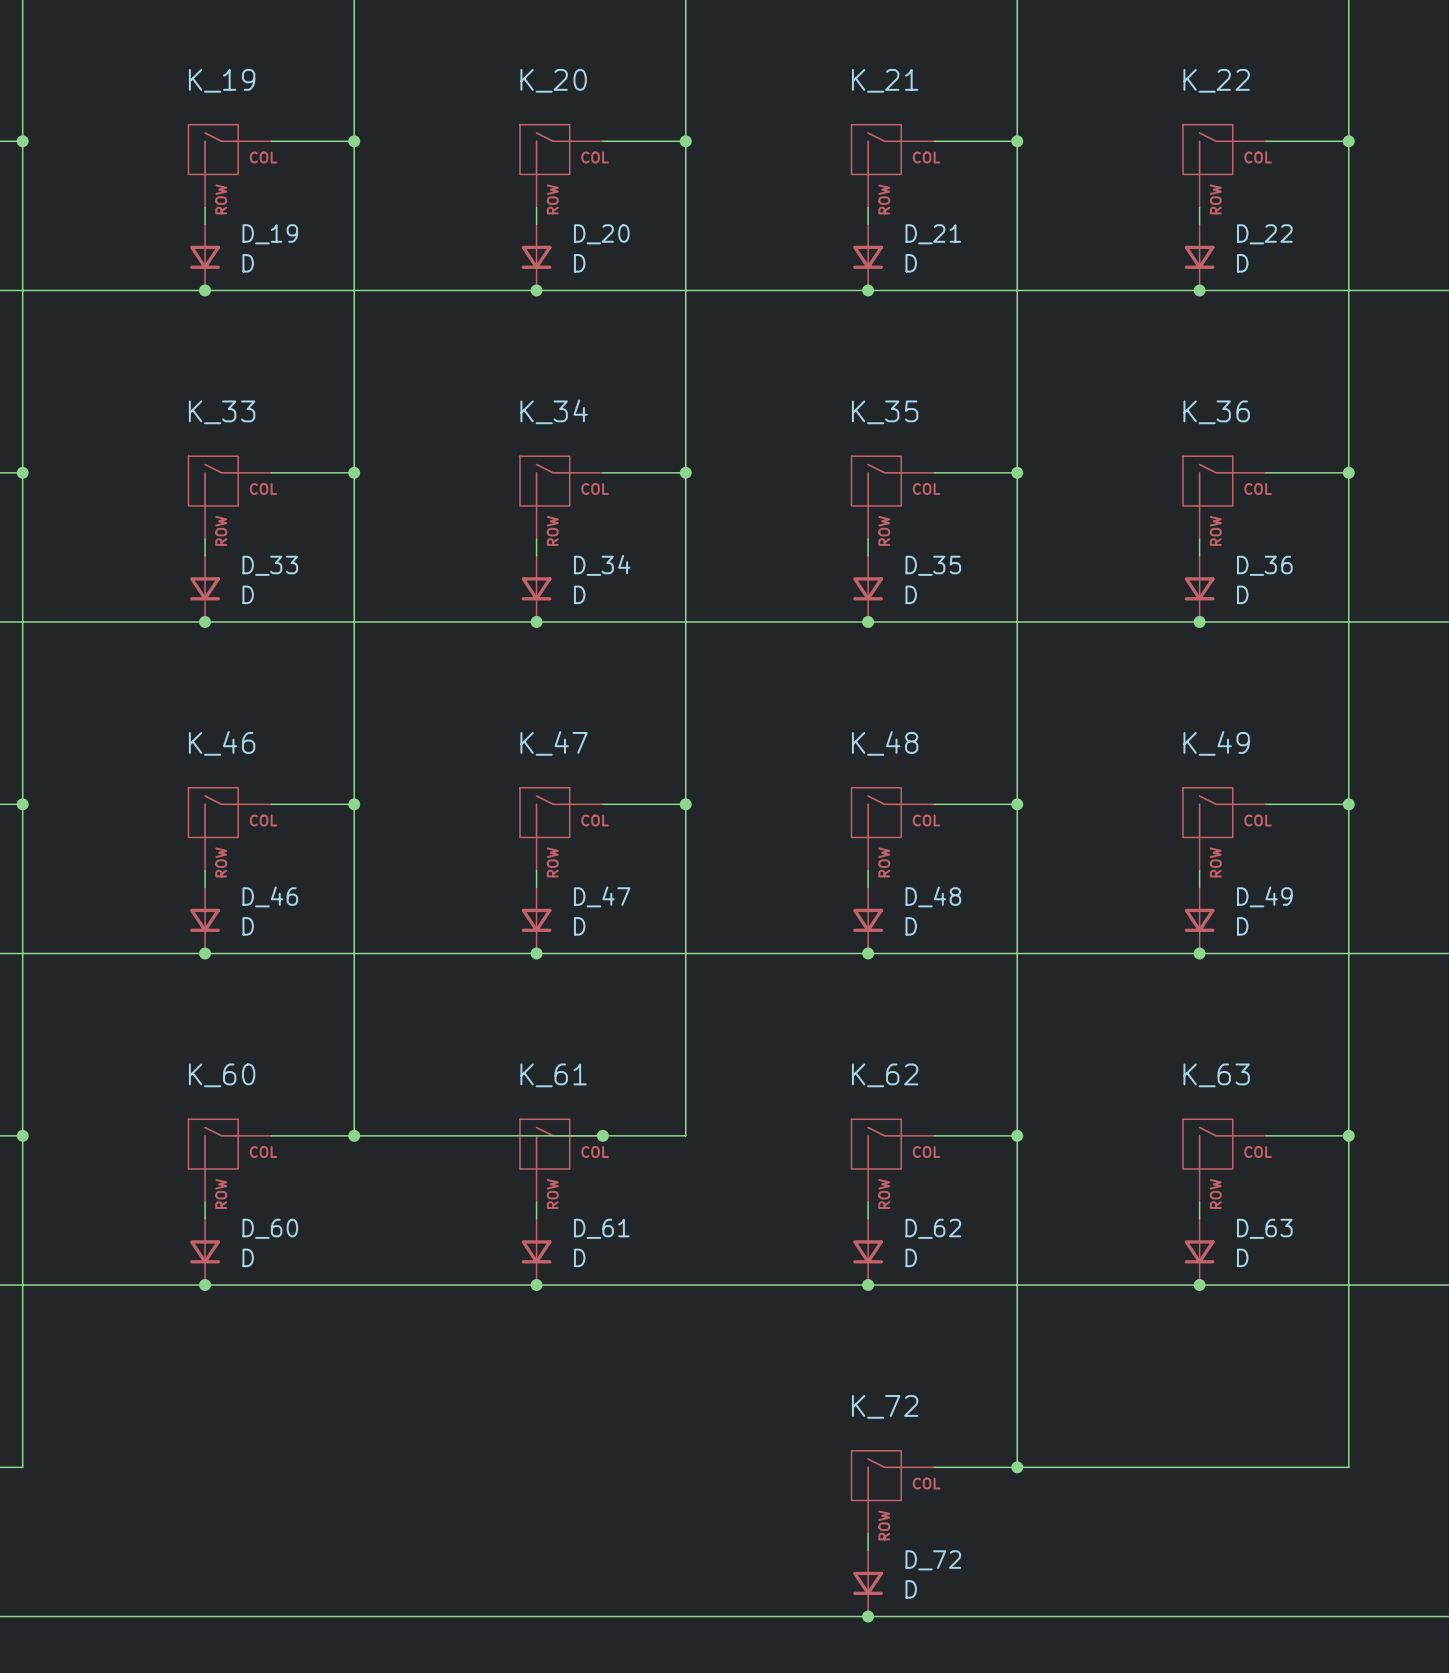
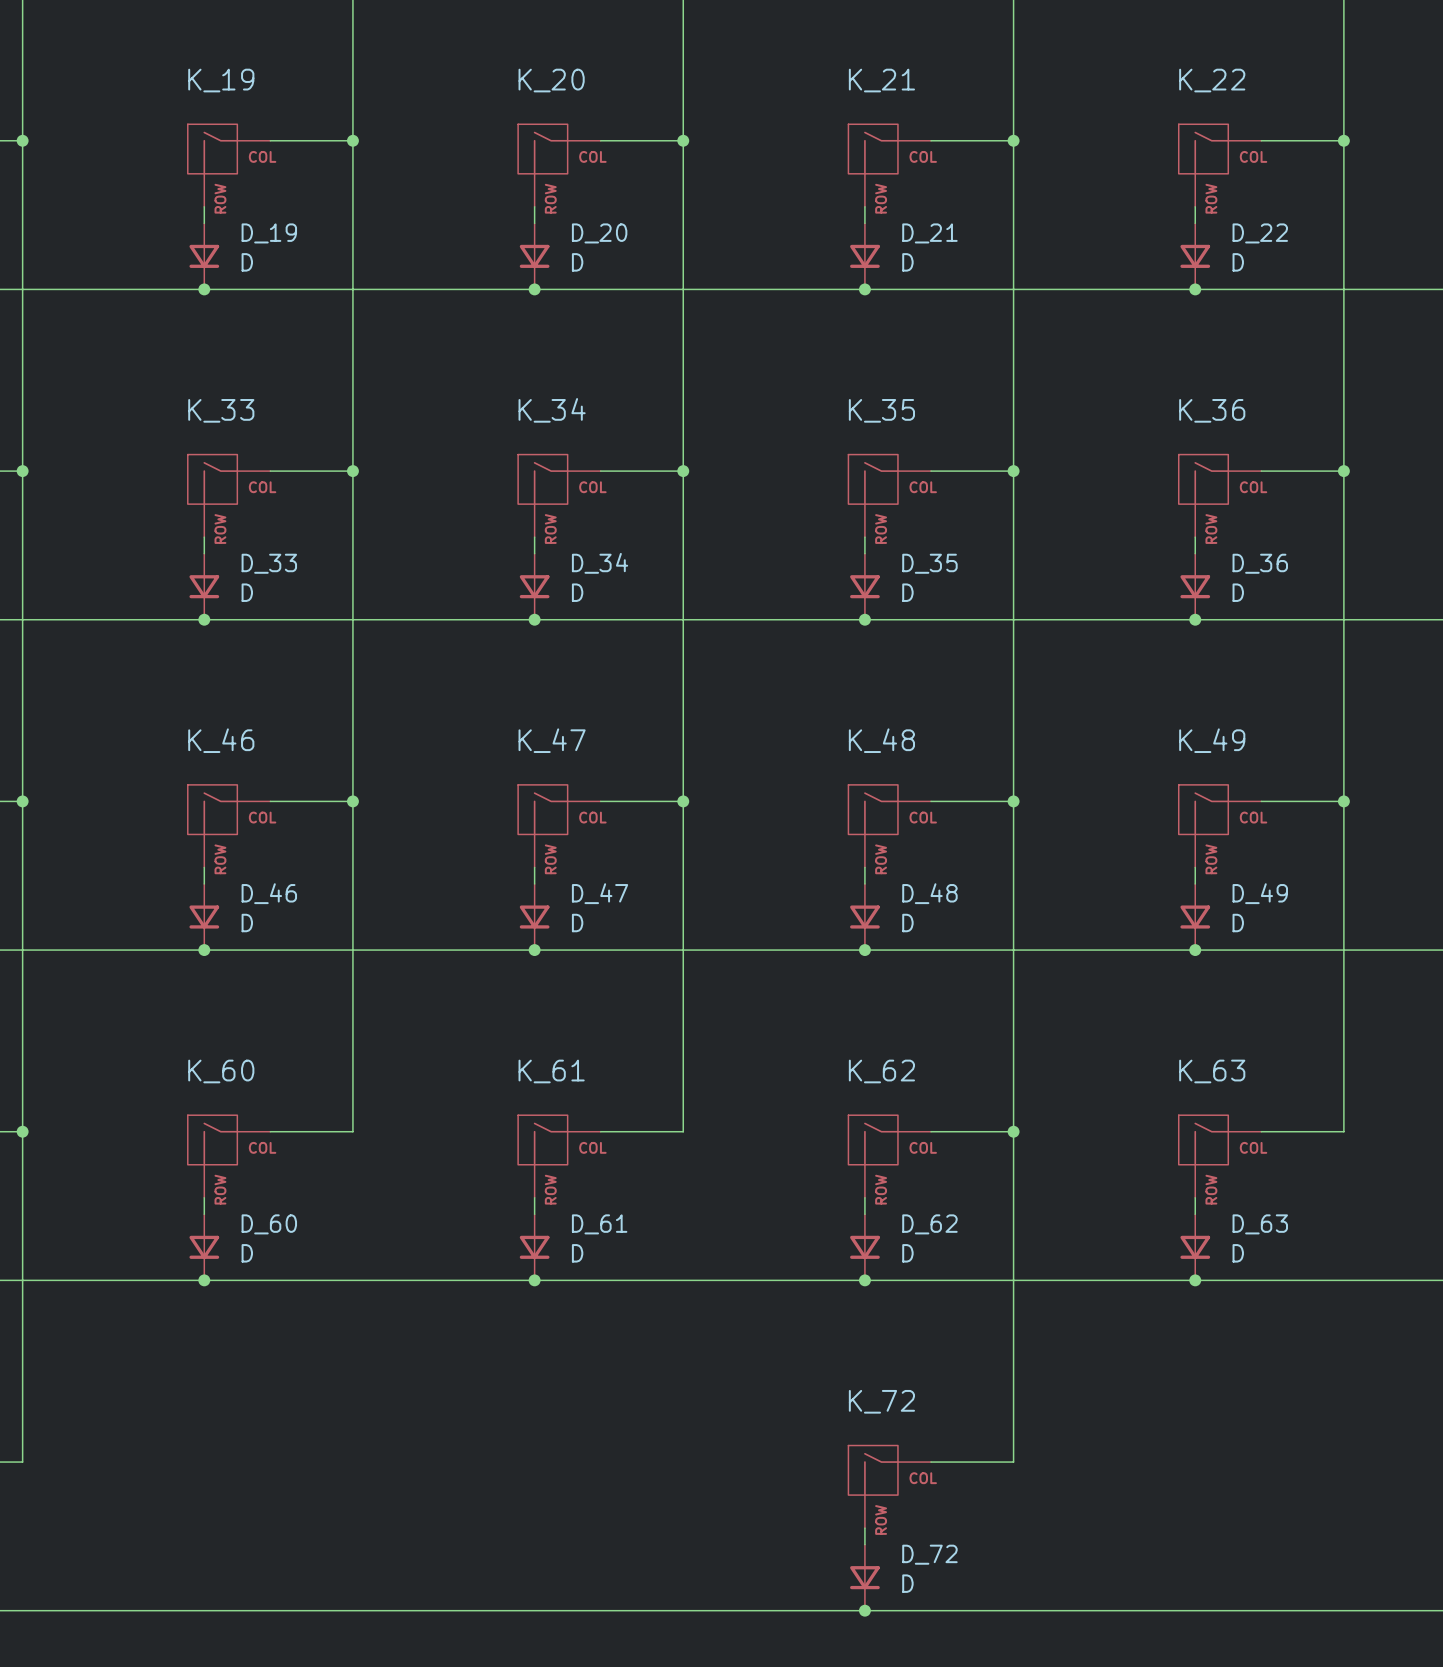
wire: (354, 1135) (602, 1135) -> none
junction: (354, 1135) -> none
junction: (602, 1135) -> none
wire: (1348, 1135) (1348, 1467) (1017, 1467) -> none
junction: (1348, 1135) -> none
junction: (1017, 1467) -> none

